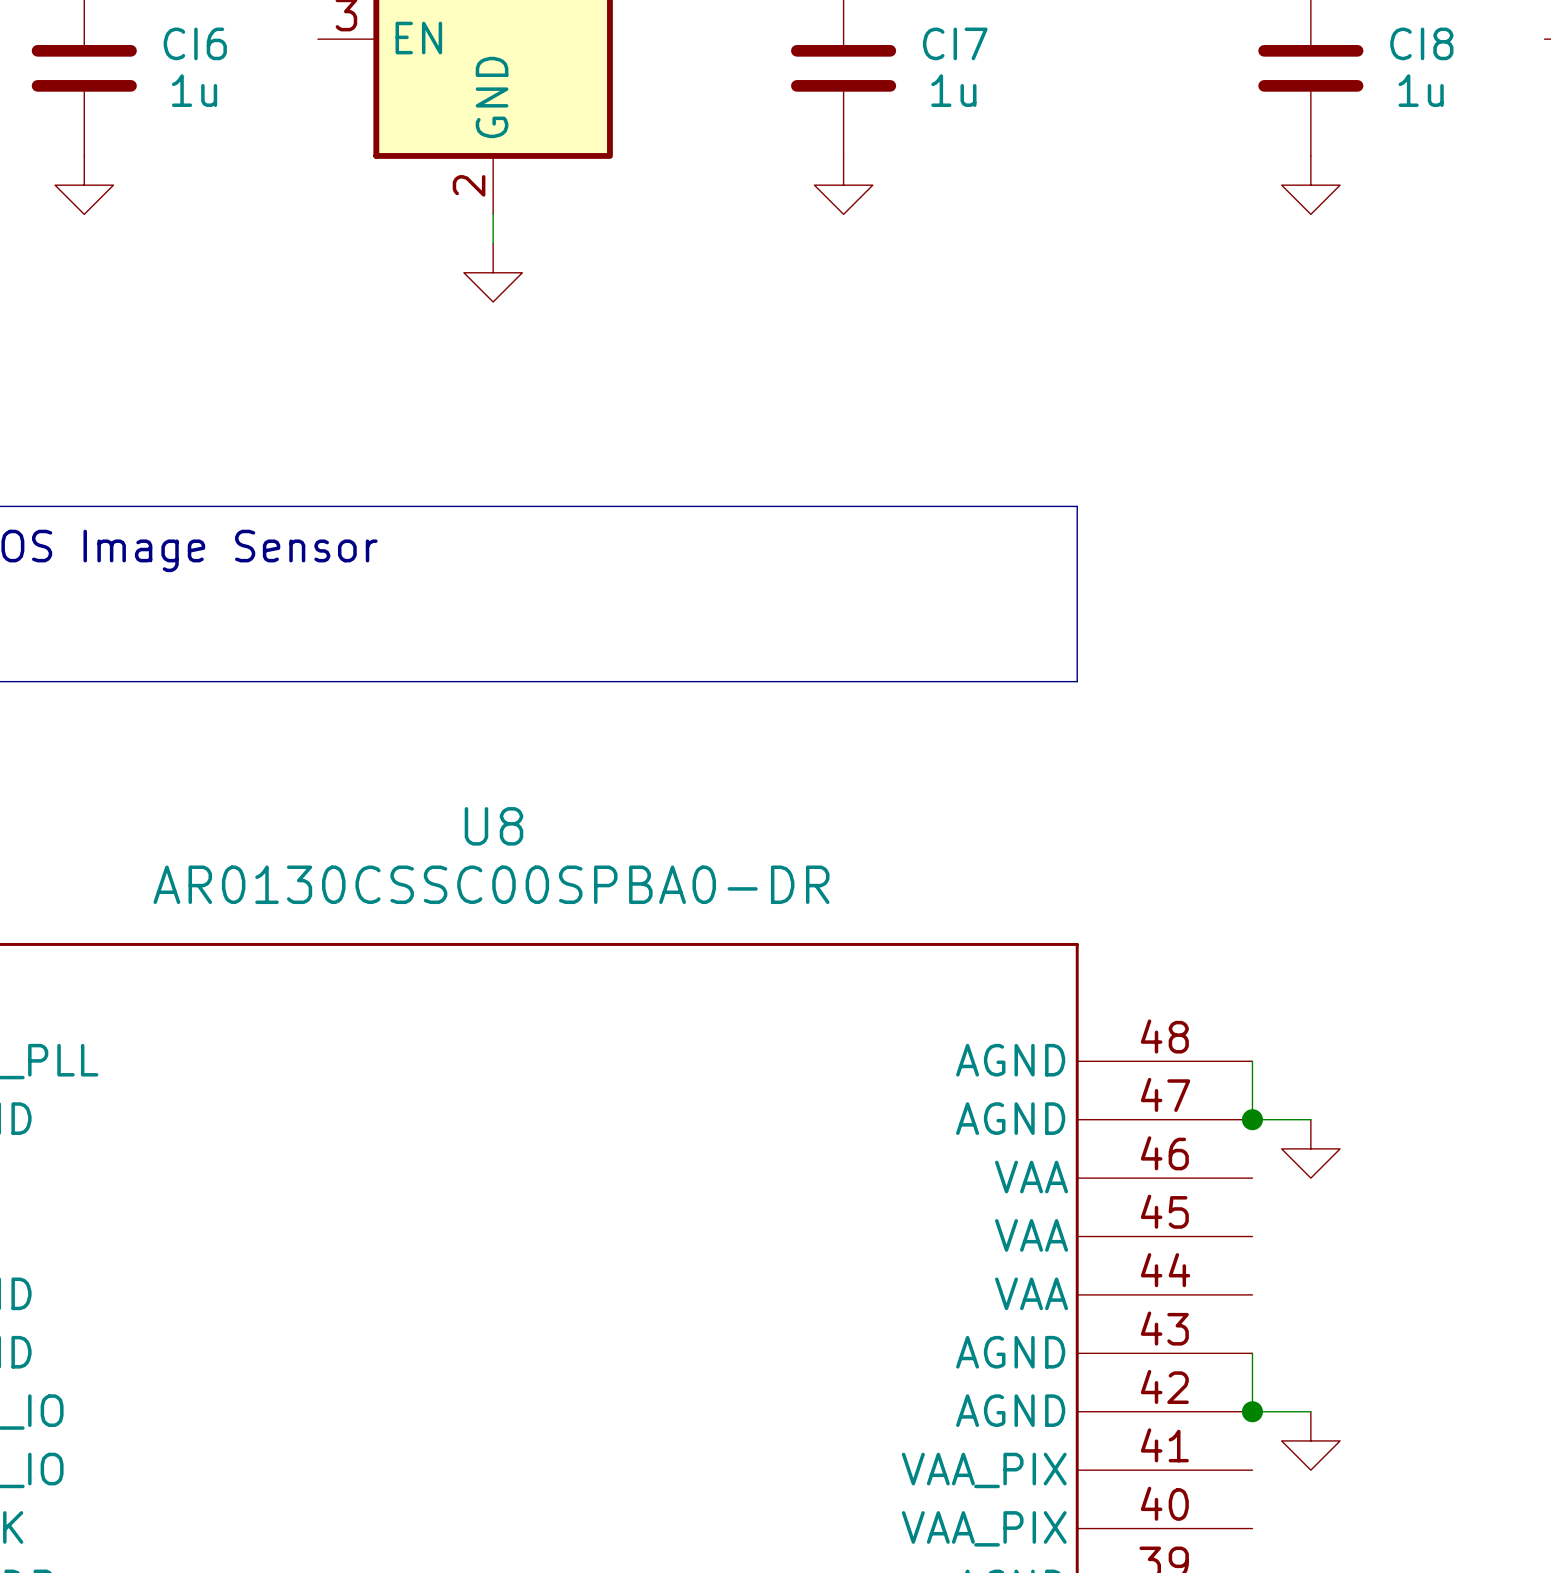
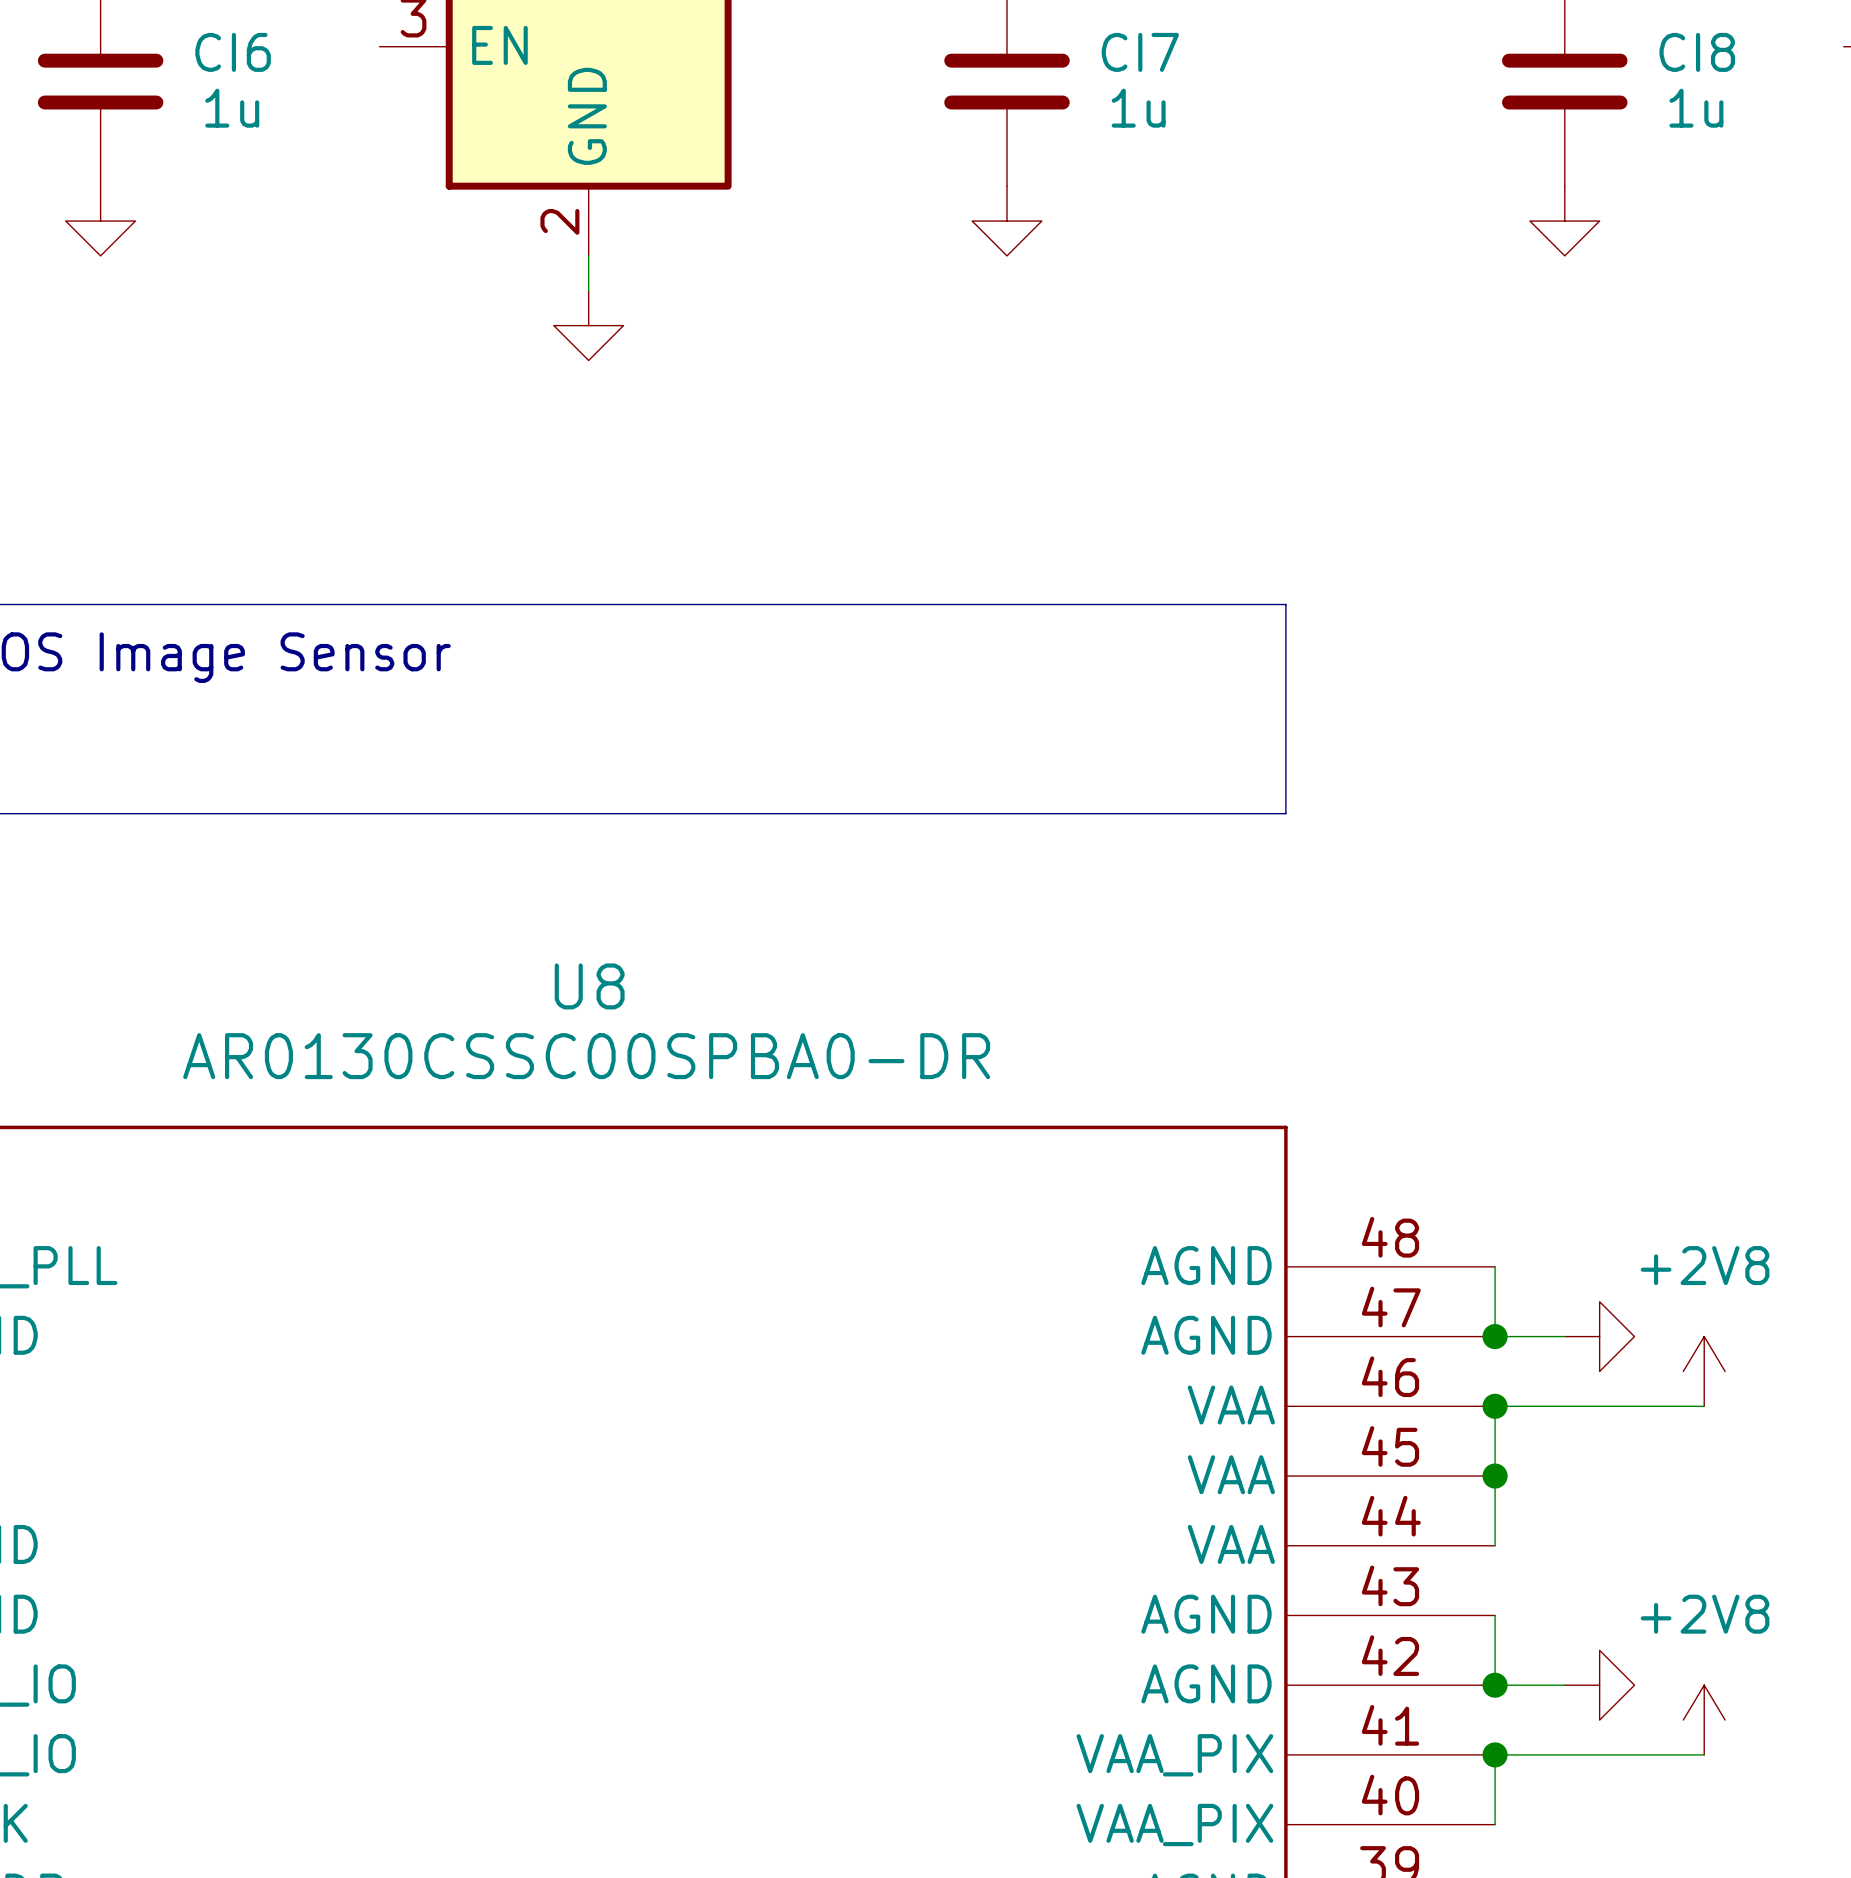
power symbol rotation: 0° (1310, 1148) -> 90° counterclockwise (1599, 1336)
power symbol position: (1310, 1148) -> (1599, 1336)
power symbol: none -> +2V8 (1704, 1371)
junction: none -> (1495, 1406)
wire: none -> (1704, 1406) (1495, 1406) (1495, 1545)
junction: none -> (1495, 1476)
power symbol rotation: 0° (1310, 1440) -> 90° counterclockwise (1599, 1685)
power symbol position: (1310, 1440) -> (1599, 1685)
power symbol: none -> +2V8 (1704, 1720)
junction: none -> (1495, 1754)
wire: none -> (1704, 1754) (1495, 1754) (1495, 1824)

